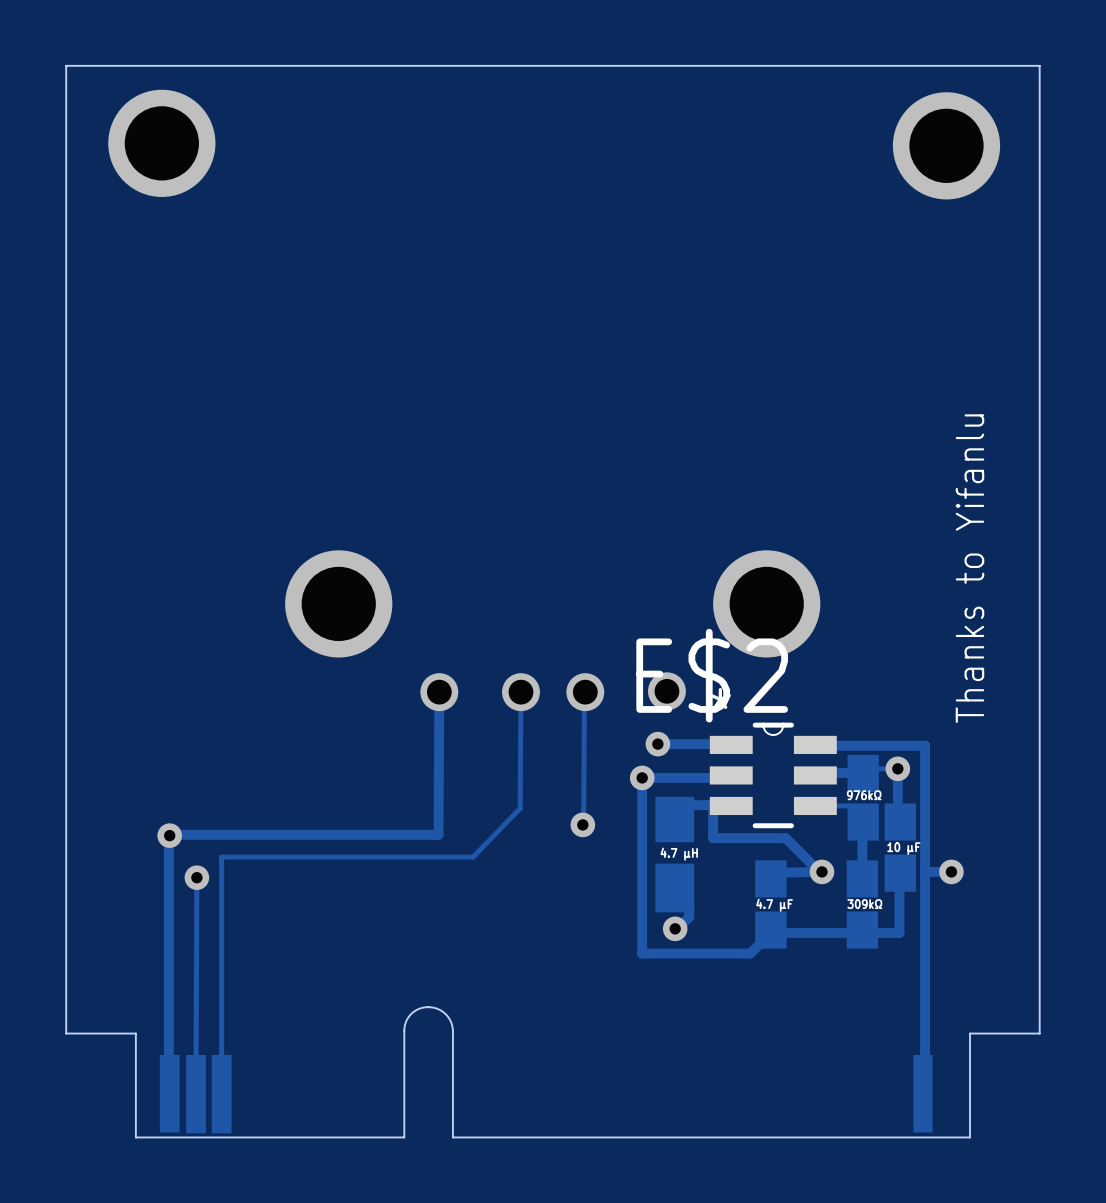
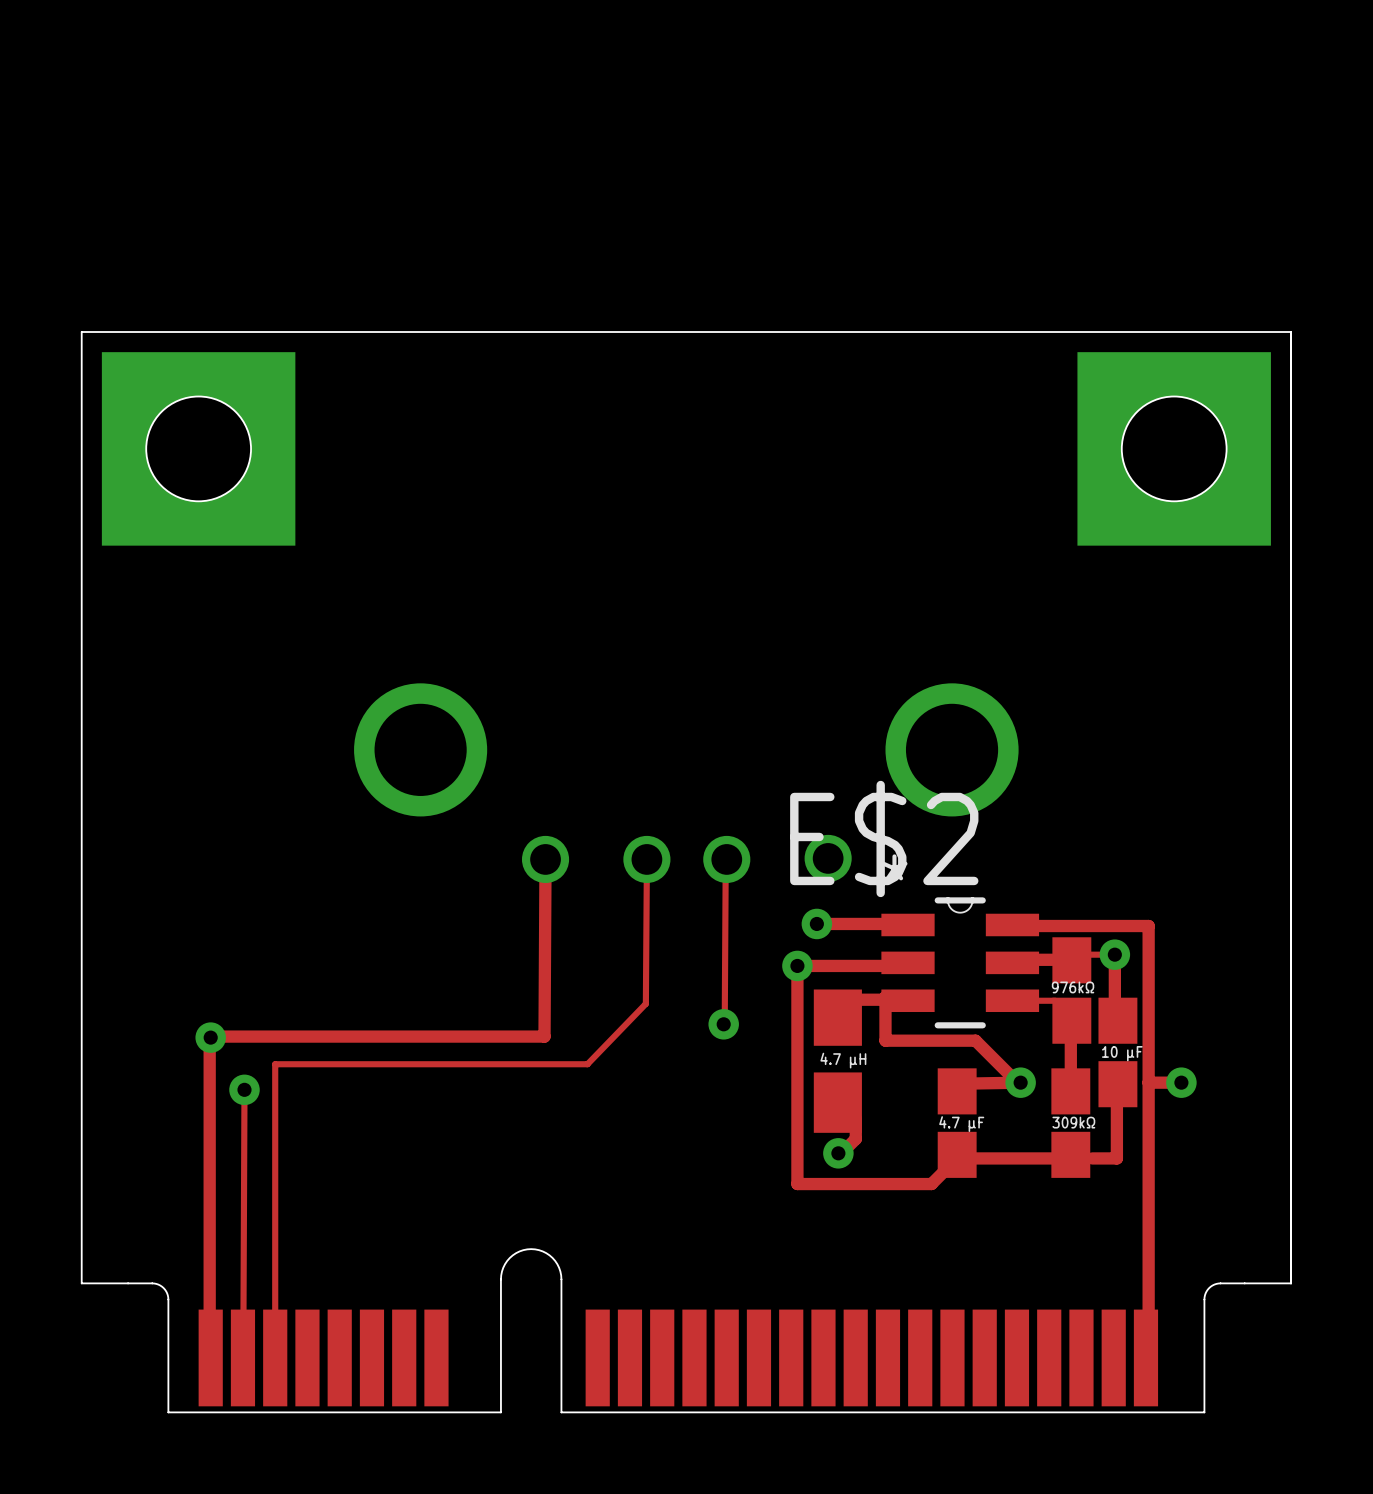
board edge: (66, 65) (66, 1033) (135, 1033) (135, 1137) (404, 1137) (404, 1027) (411, 1014) (418, 1008) (427, 1007) (443, 1012) (449, 1019) (452, 1028) (452, 1137) (969, 1137) (969, 1033) (1039, 1033) (1039, 65) (66, 65) -> none
via: (161, 143) -> none
via: (946, 145) -> none
text: Thanks to Yifanlu (969, 568) -> none
part: none -> (686, 872)
drawing: [159, 1054, 232, 1134] -> none
drawing: [913, 1054, 933, 1133] -> none

